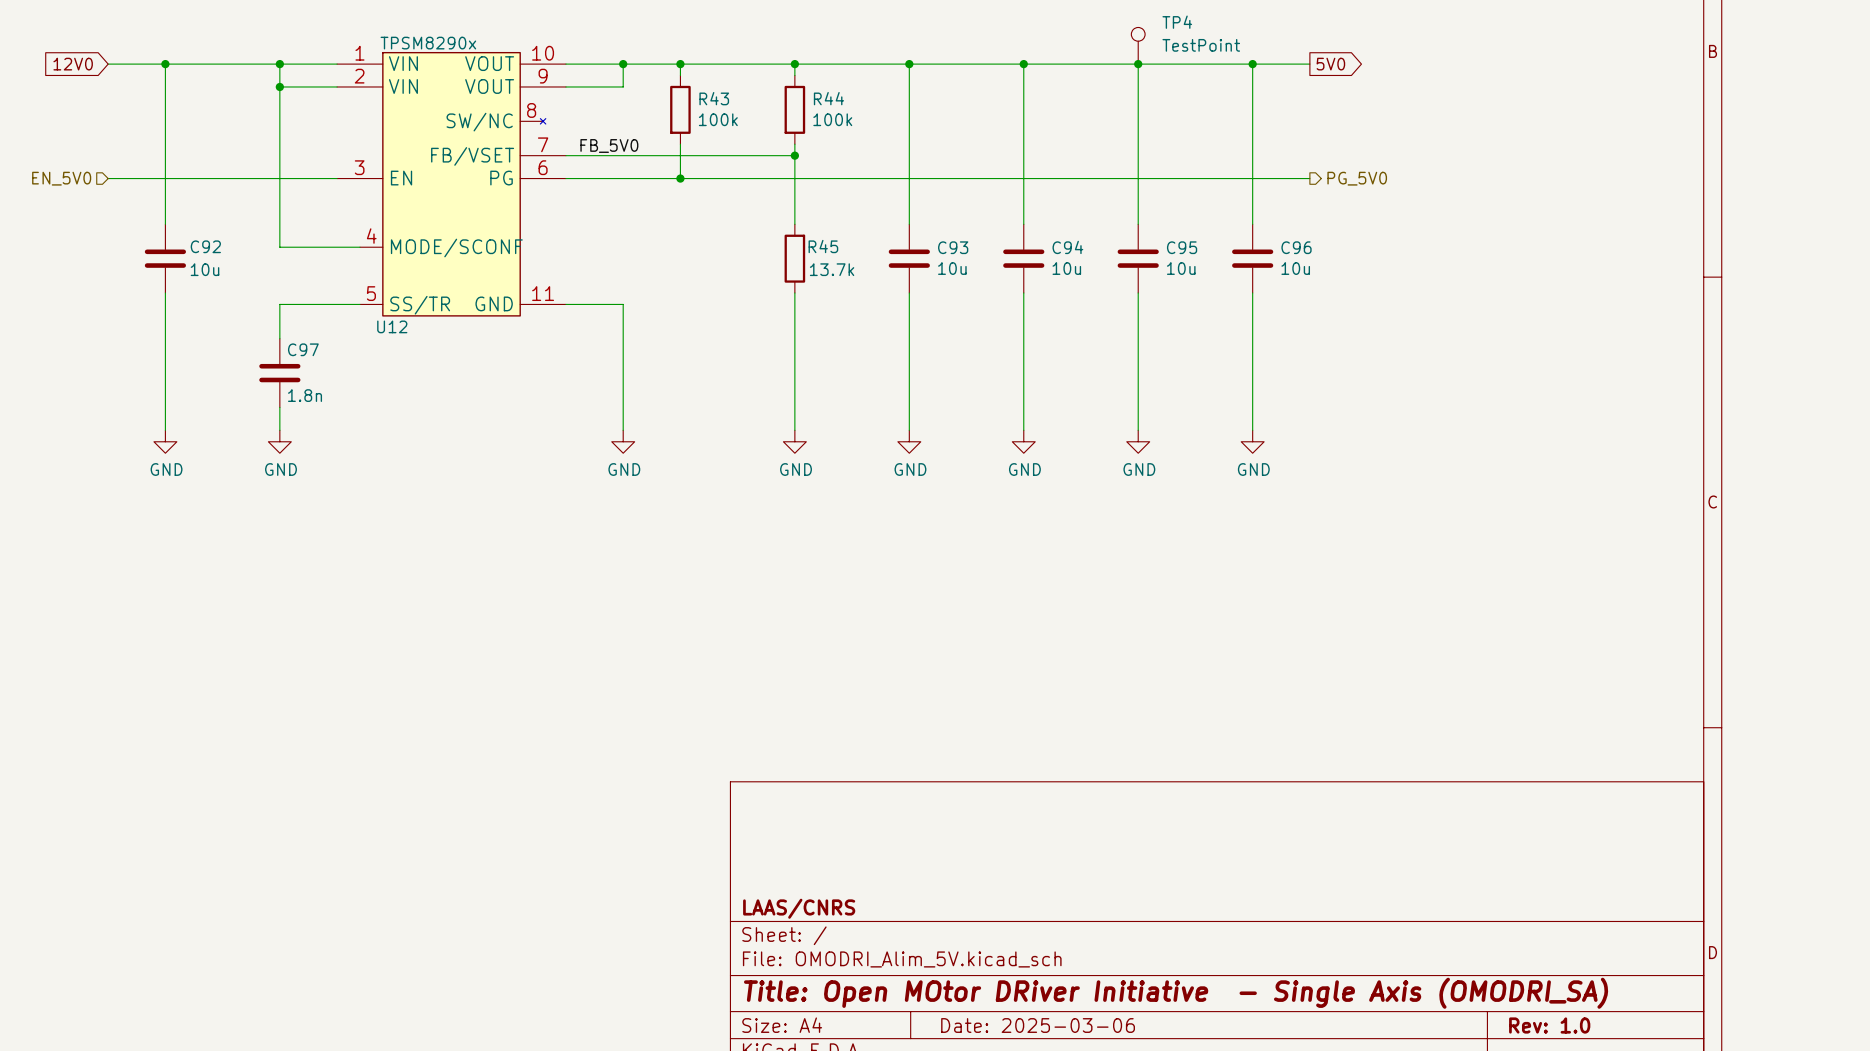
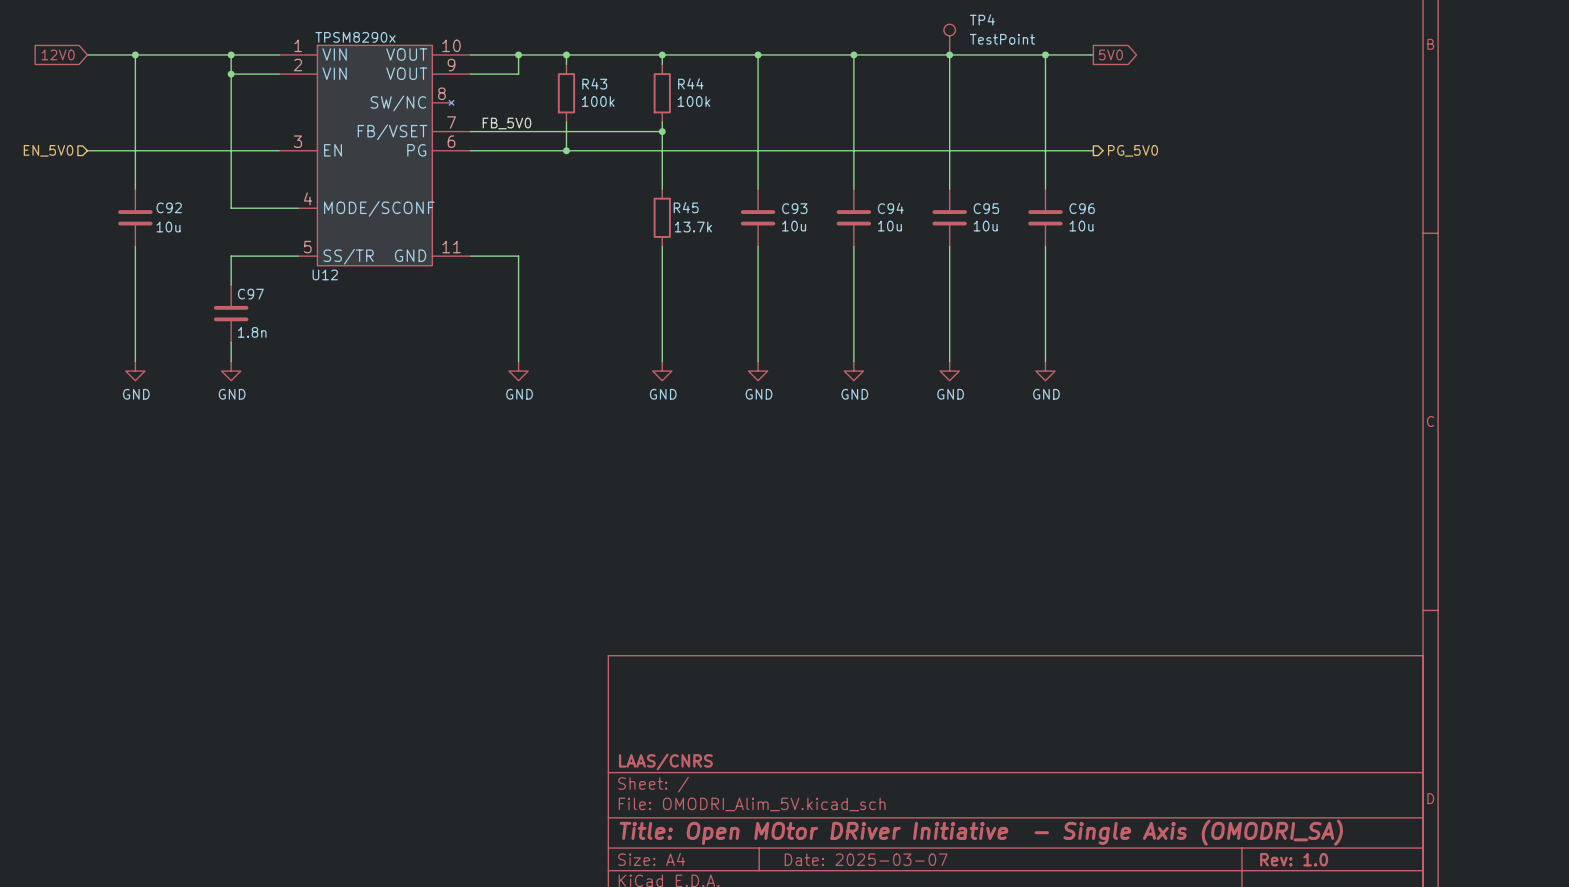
title block: Date: 2025-03-06 (1038, 1025) -> Date: 2025-03-07 (866, 859)

